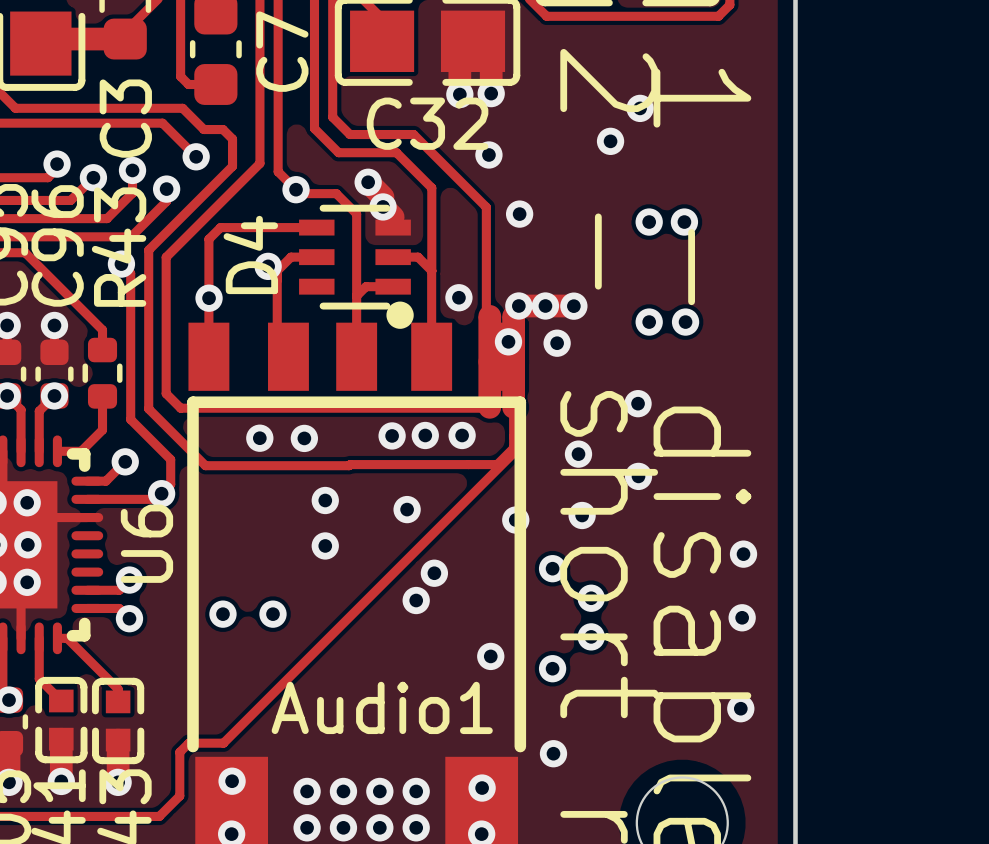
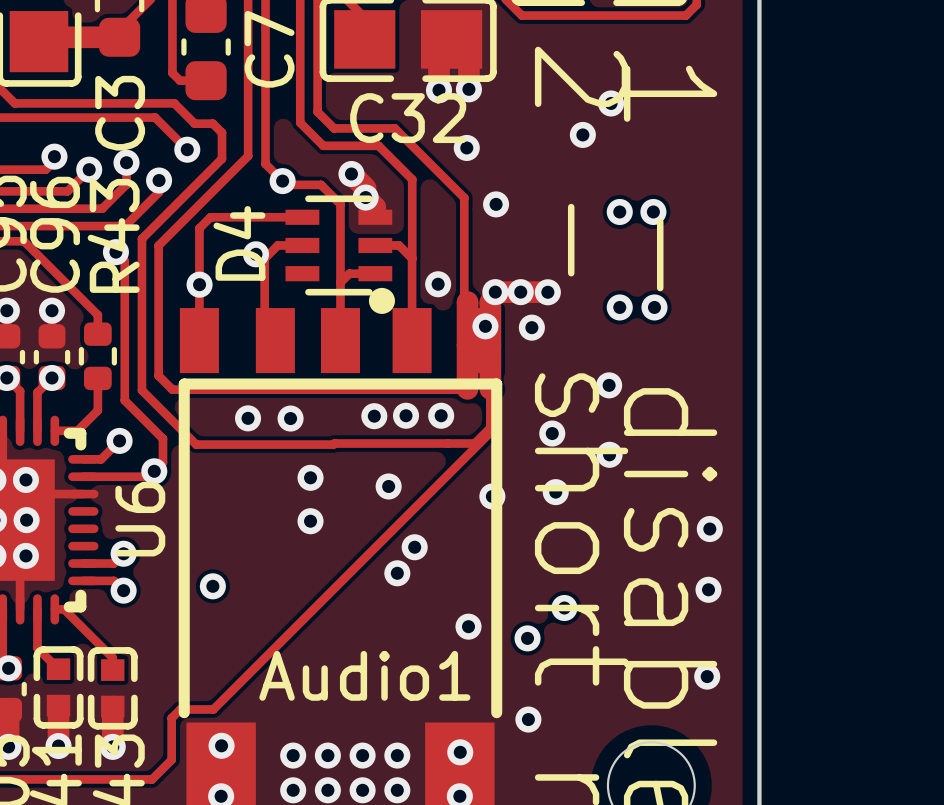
via: (552, 568) -> none
via: (591, 598) -> none
via: (272, 614) -> none

